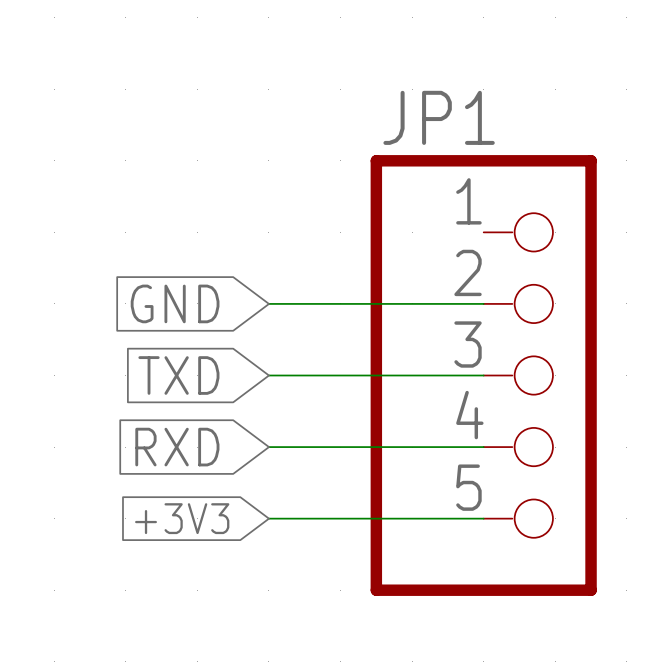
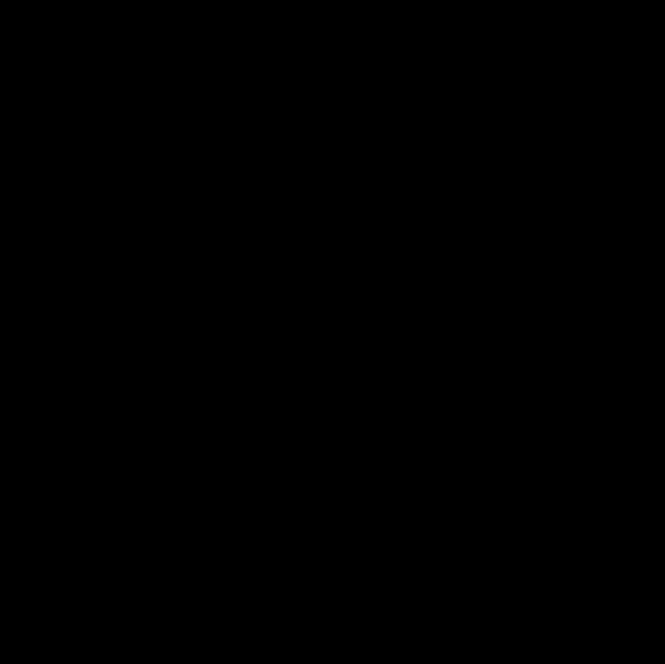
global label: GND (175, 303) -> none
wire: (268, 303) (483, 303) -> none
global label: TXD (178, 375) -> none
wire: (268, 375) (483, 375) -> none
JP1: (483, 375) -> none
global label: RXD (177, 447) -> none
wire: (268, 447) (483, 447) -> none
global label: +3V3 (182, 518) -> none
wire: (268, 518) (483, 518) -> none

